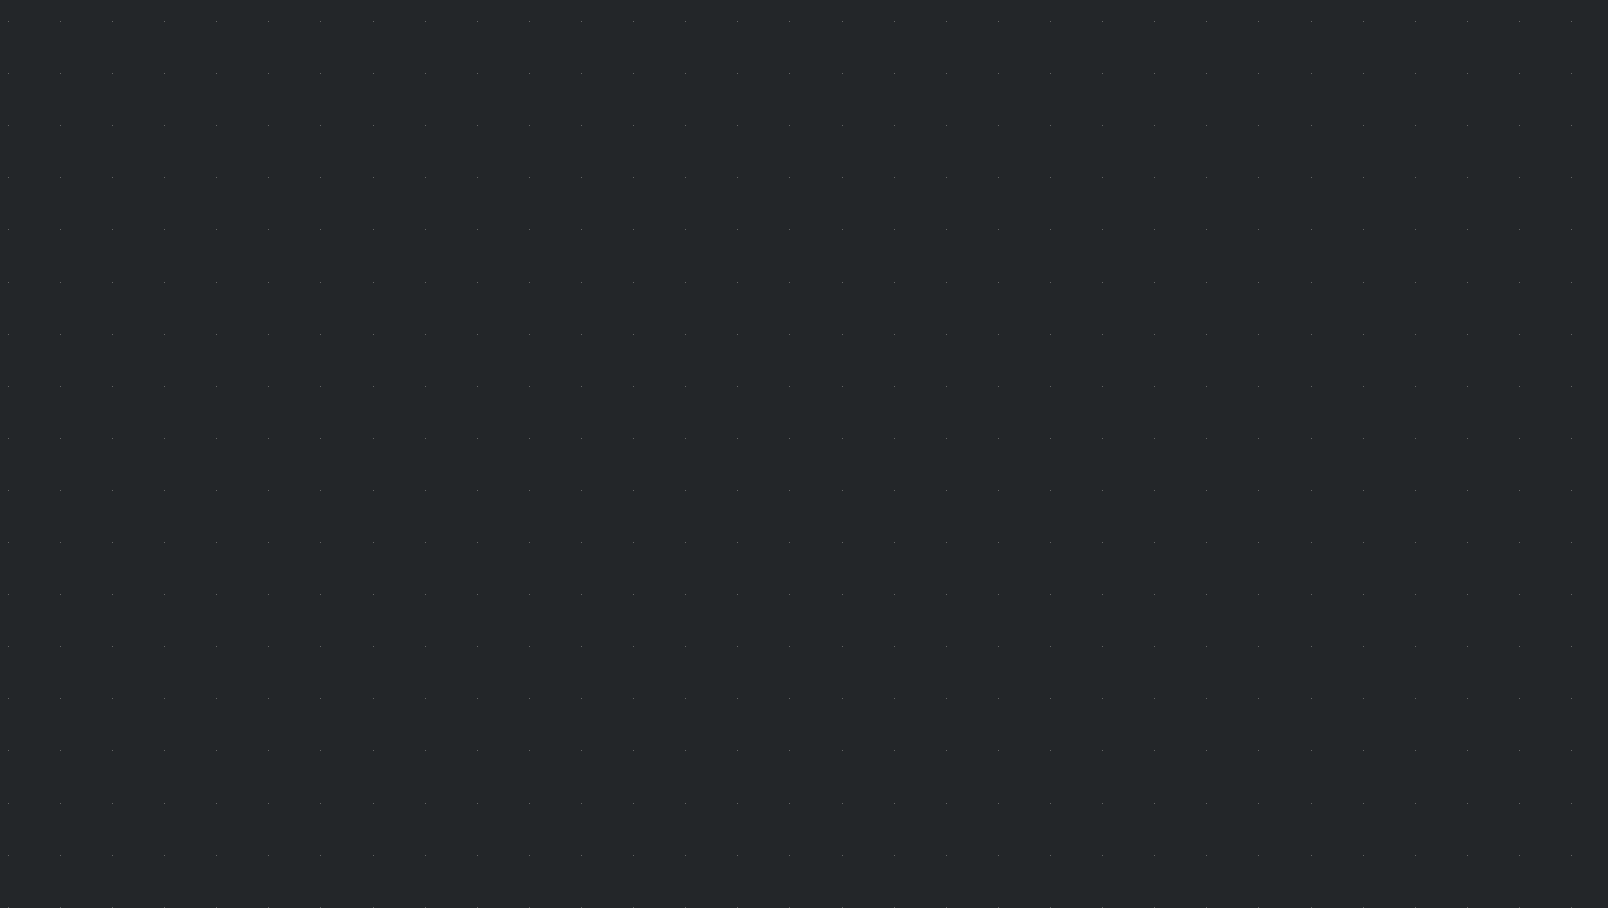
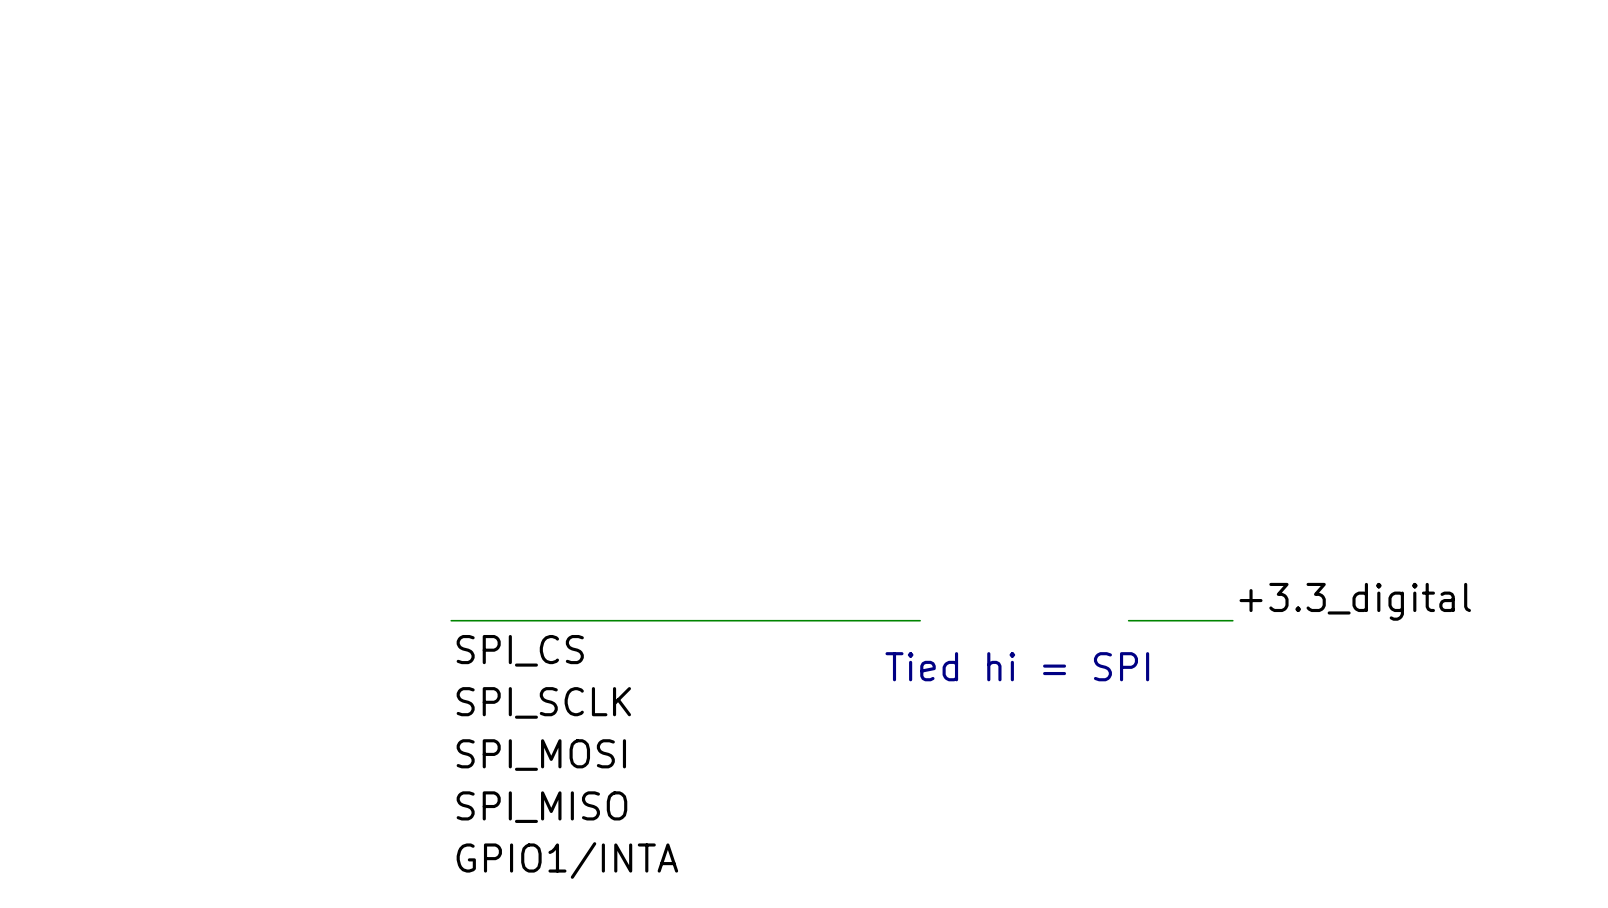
label: none -> +3.3_digital (1355, 601)
wire: none -> (451, 620) (920, 620)
wire: none -> (1128, 620) (1232, 620)
label: none -> SPI_CS (520, 650)
text: none -> Tied hi = SPI (1017, 666)
label: none -> SPI_SCLK (543, 702)
label: none -> SPI_MOSI (541, 755)
label: none -> SPI_MISO (541, 807)
label: none -> GPIO1/INTA (567, 860)

